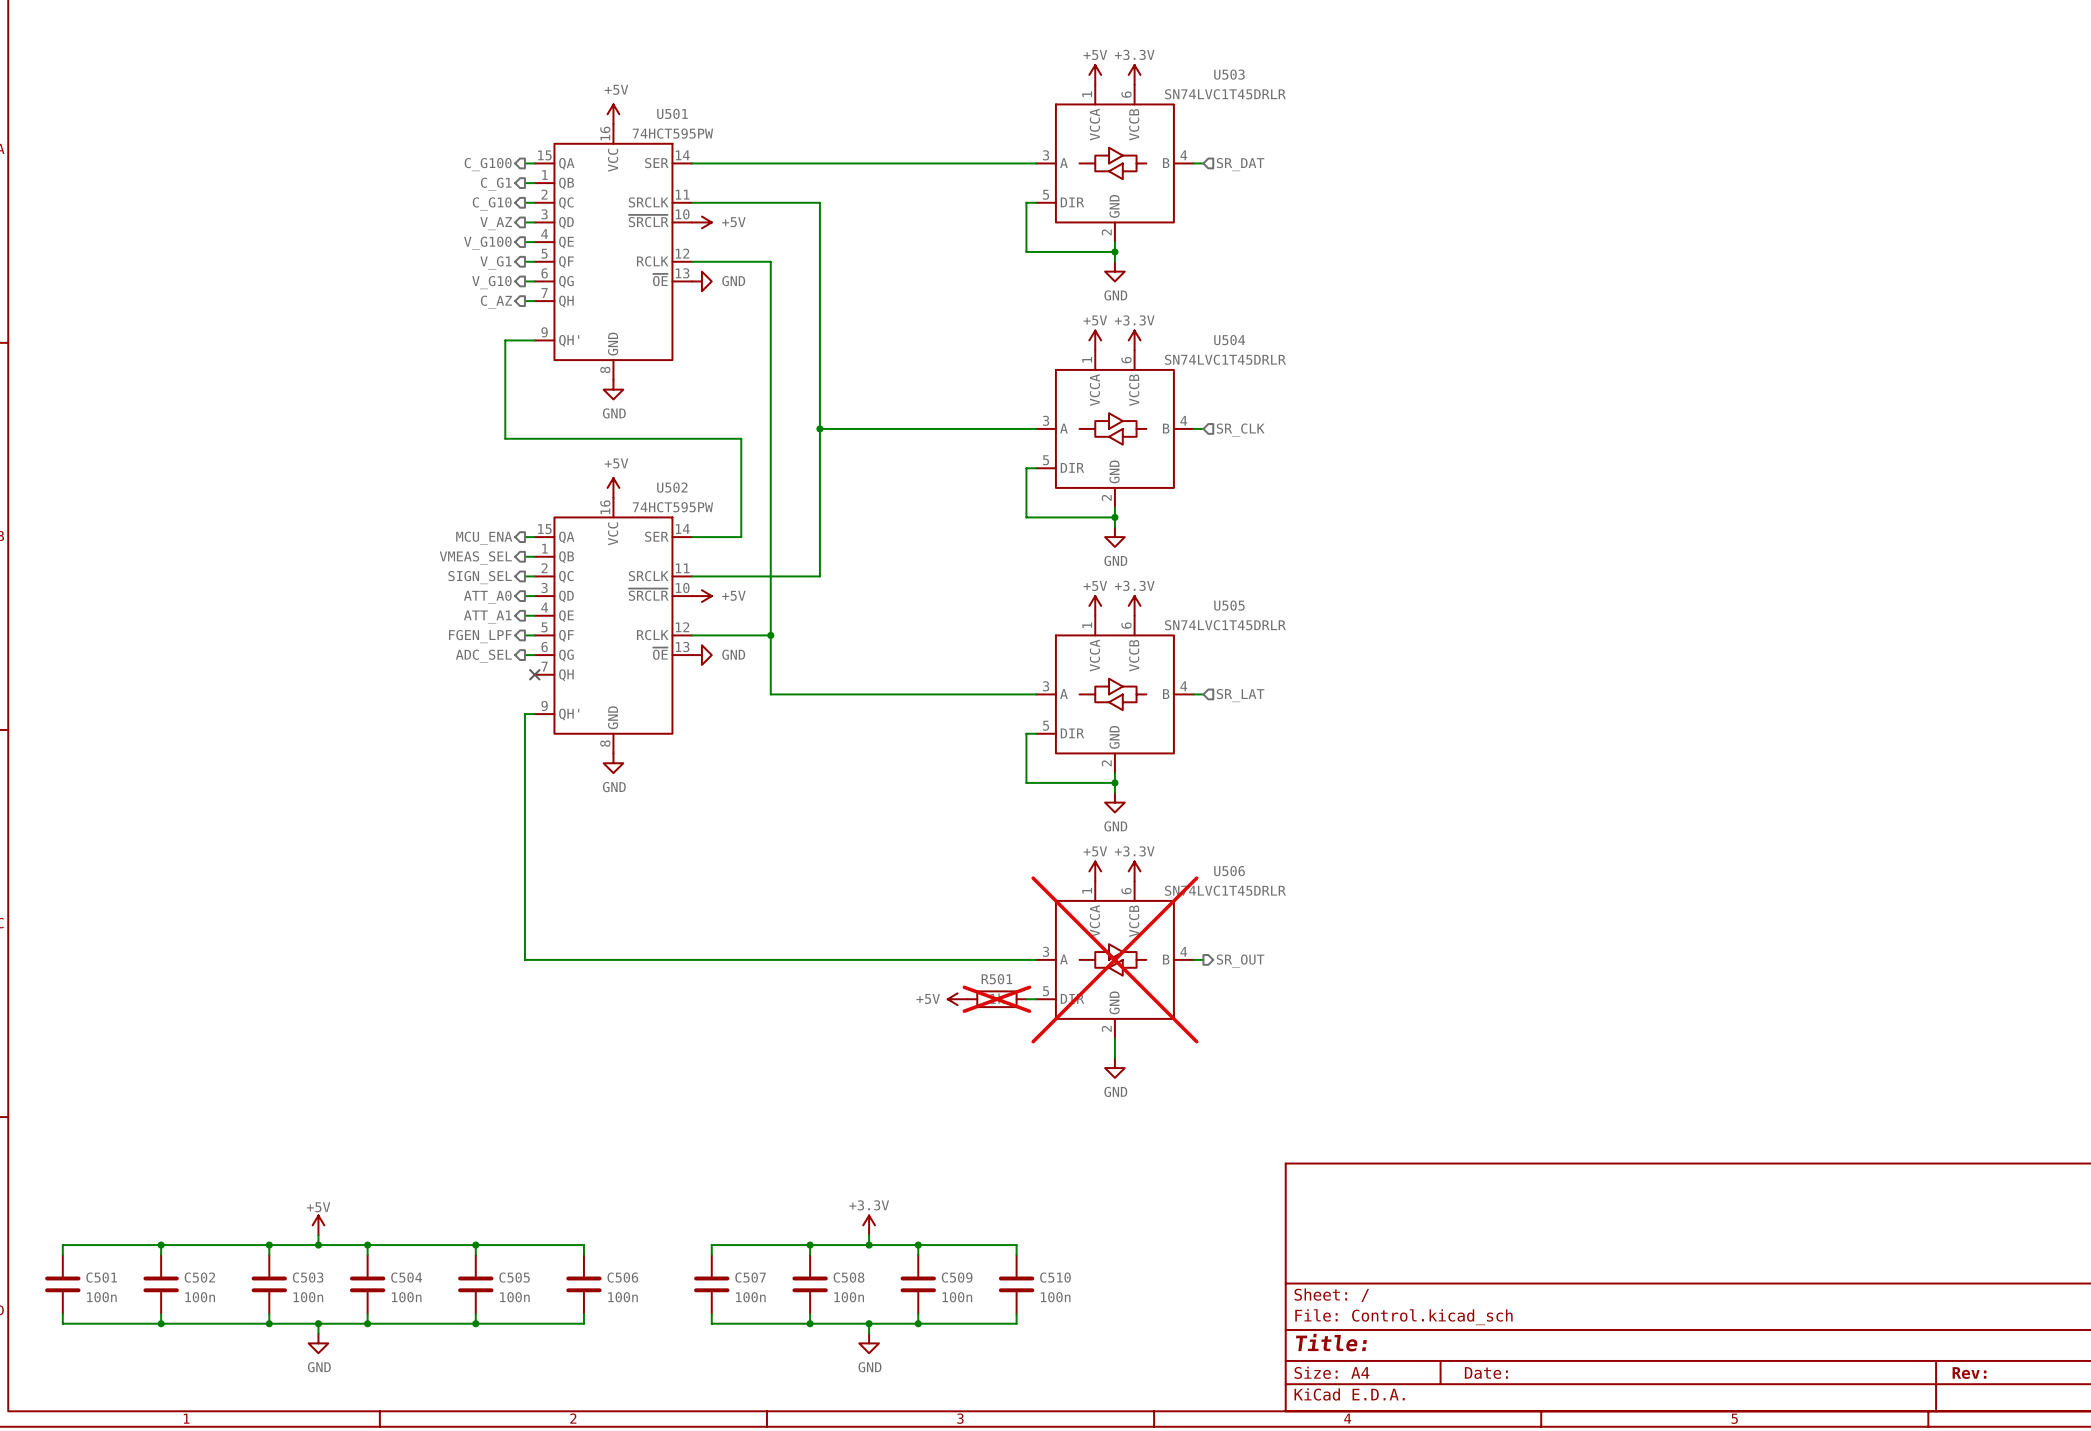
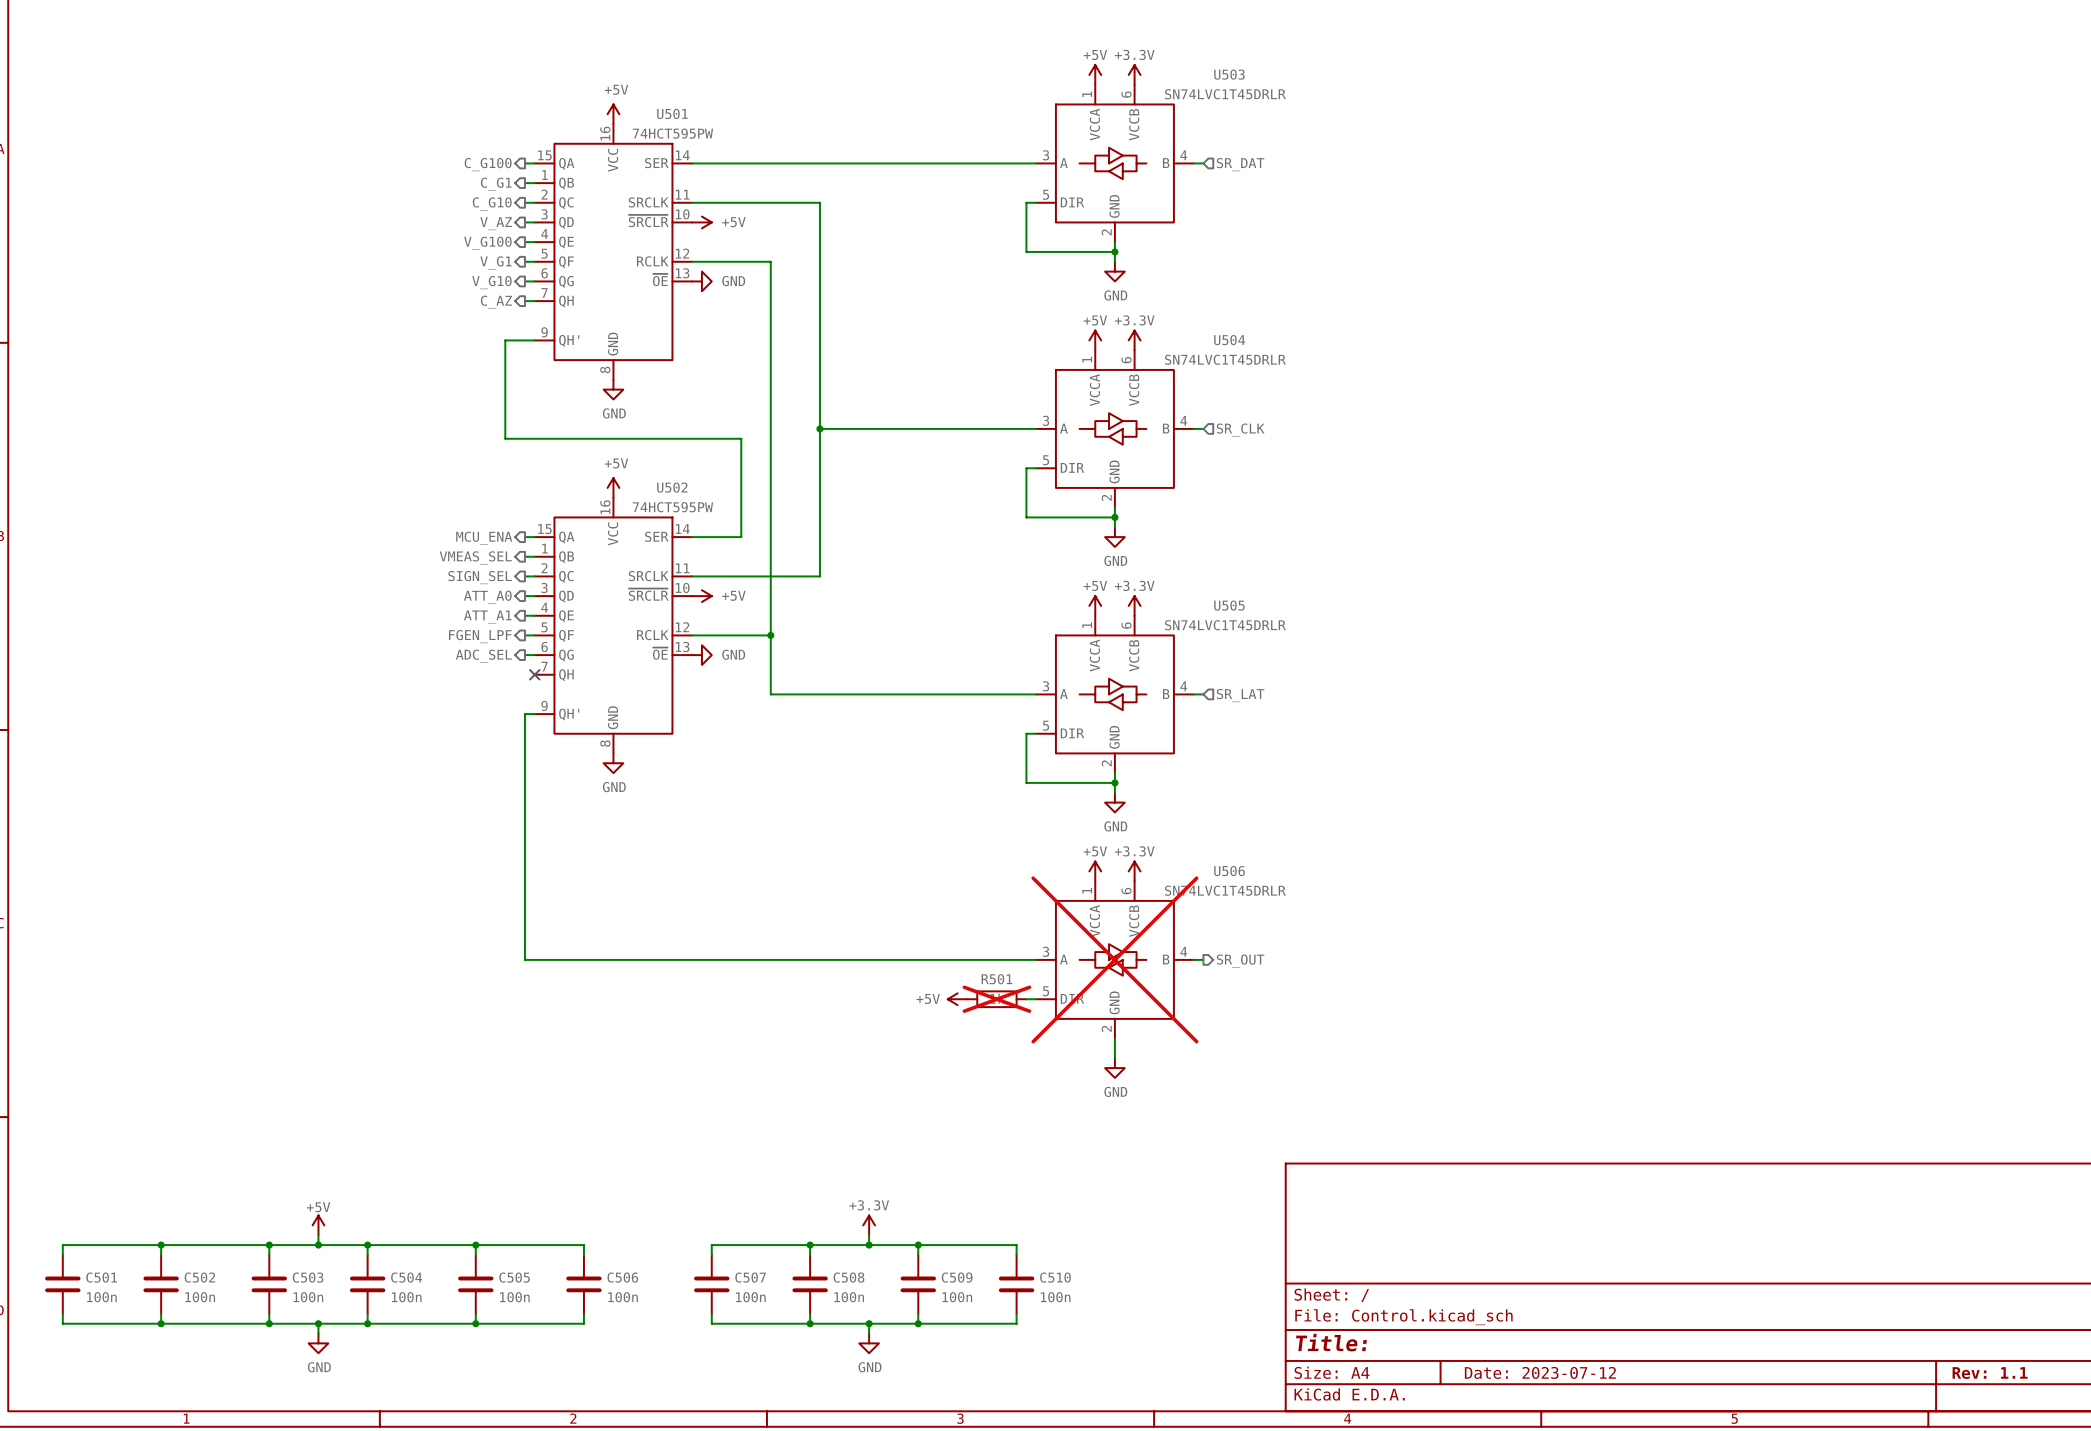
title block: Date: (1486, 1373) -> Date: 2023-07-12 (1540, 1372)
title block: Rev: (1969, 1373) -> Rev: 1.1 (1990, 1373)

